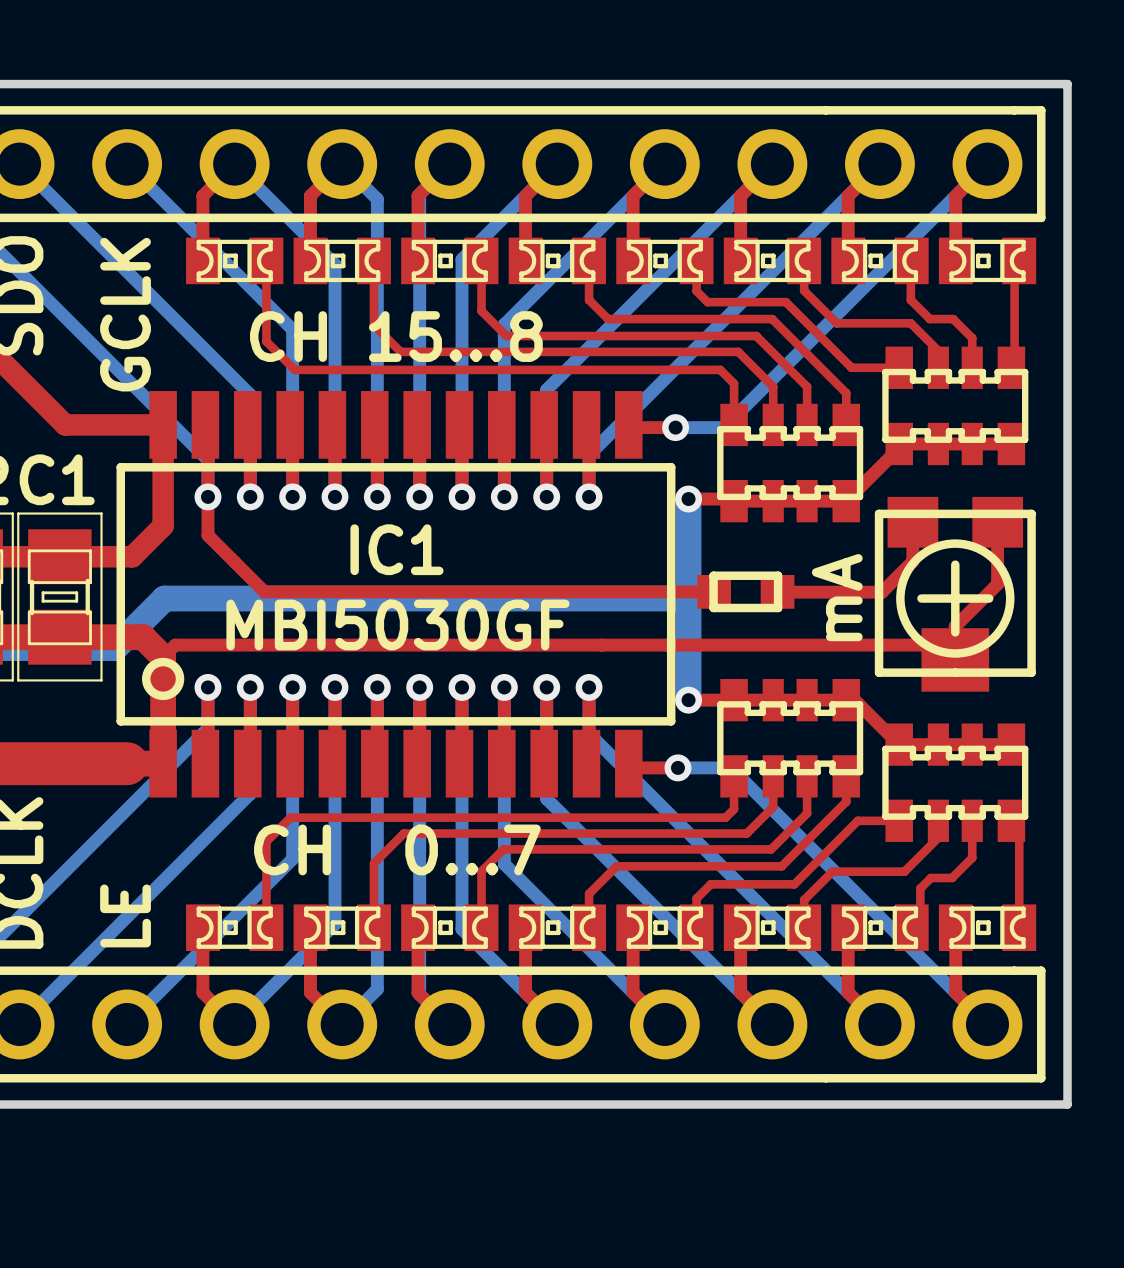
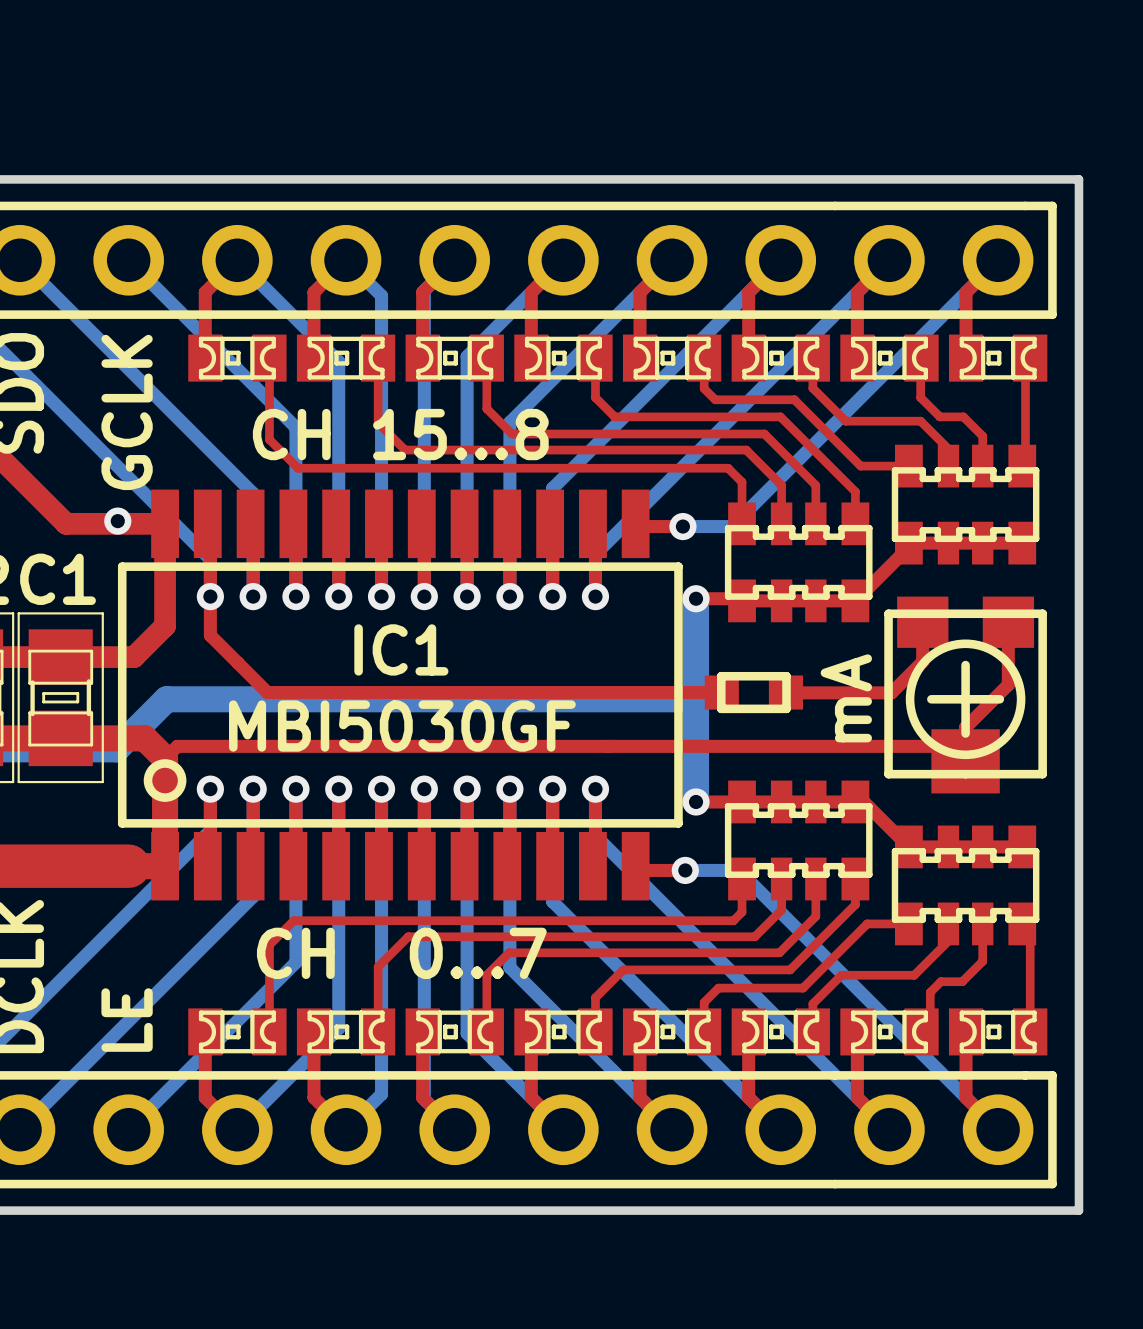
via: none -> (117, 521)

